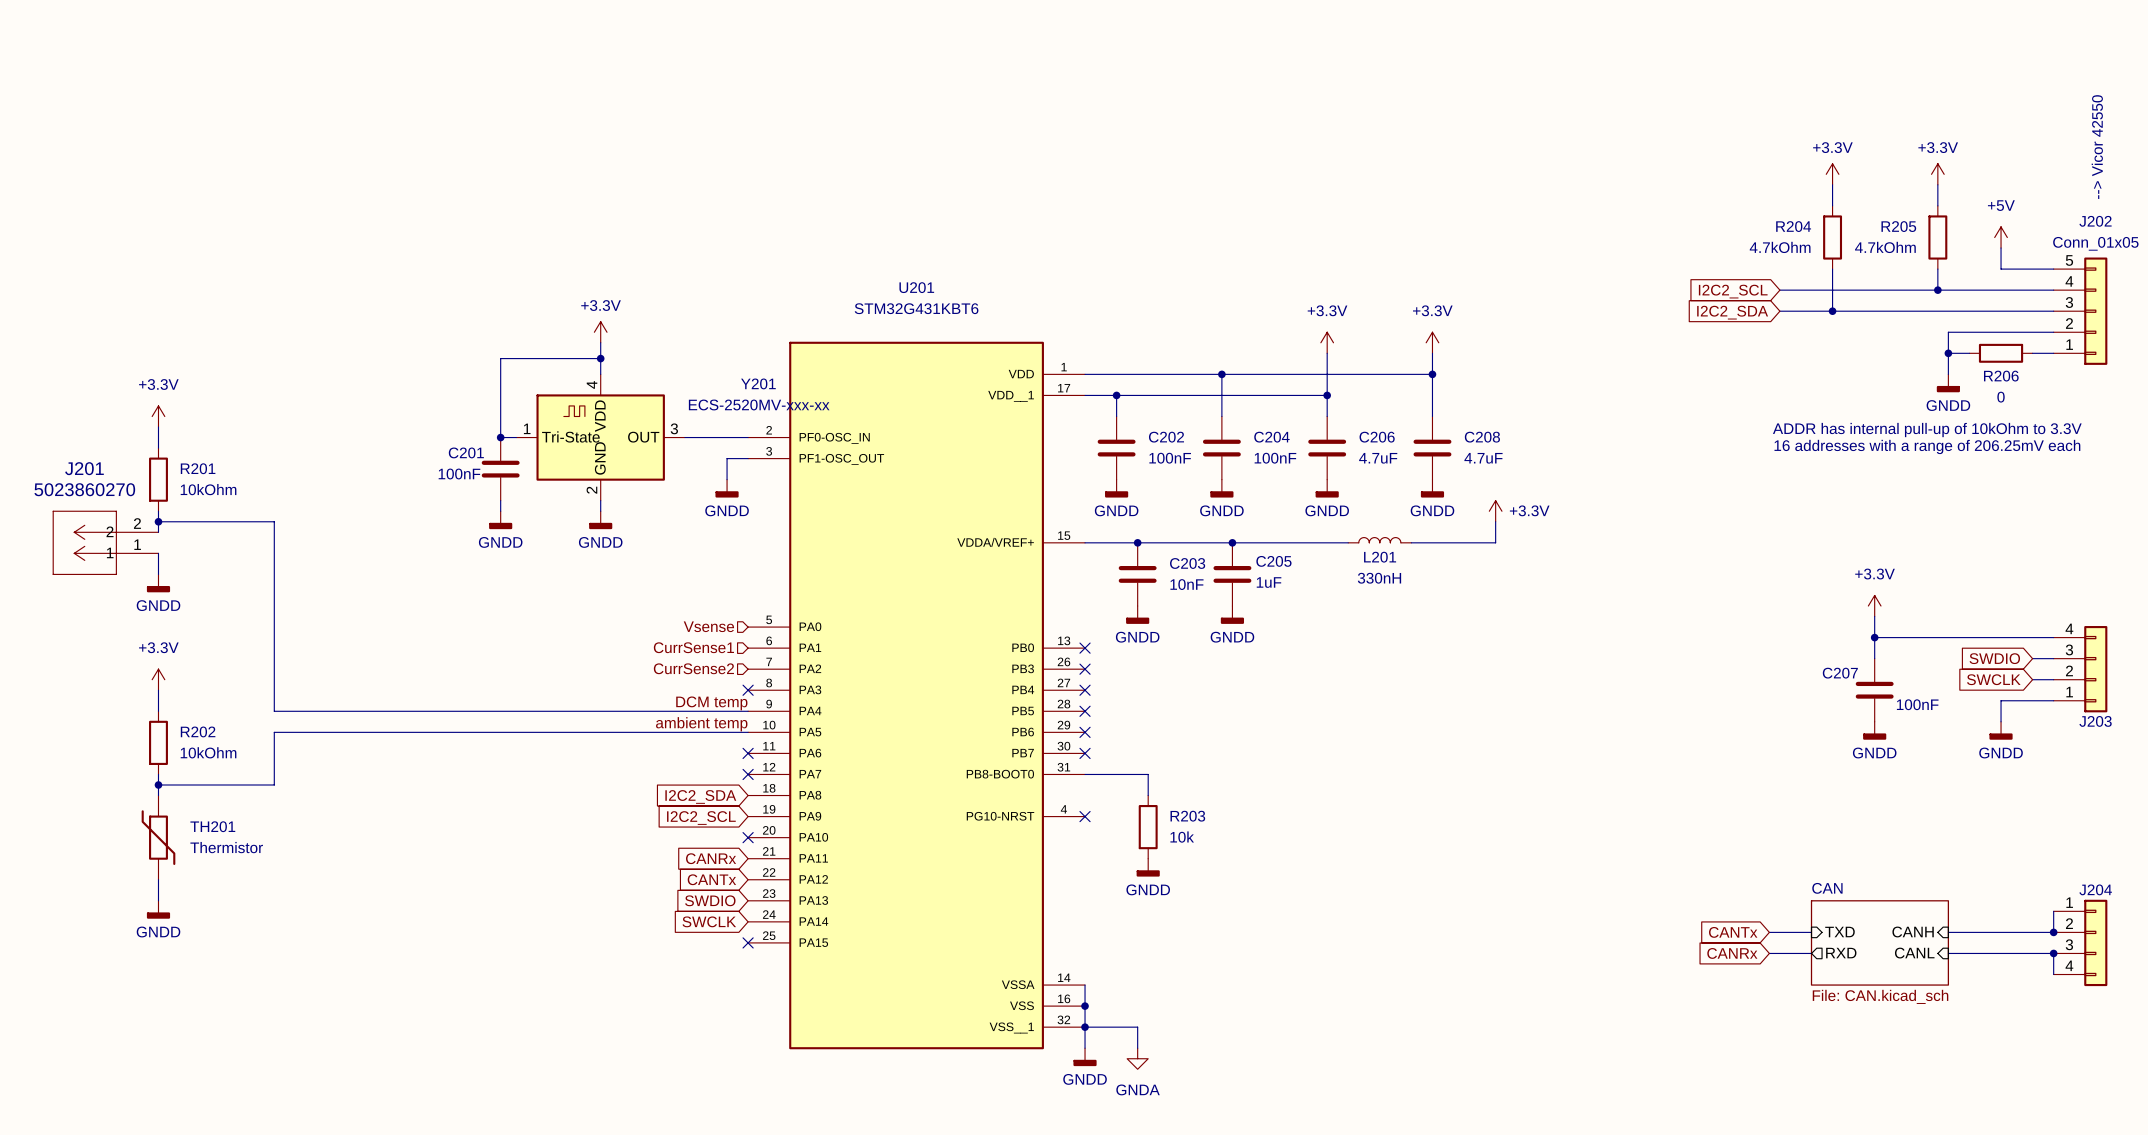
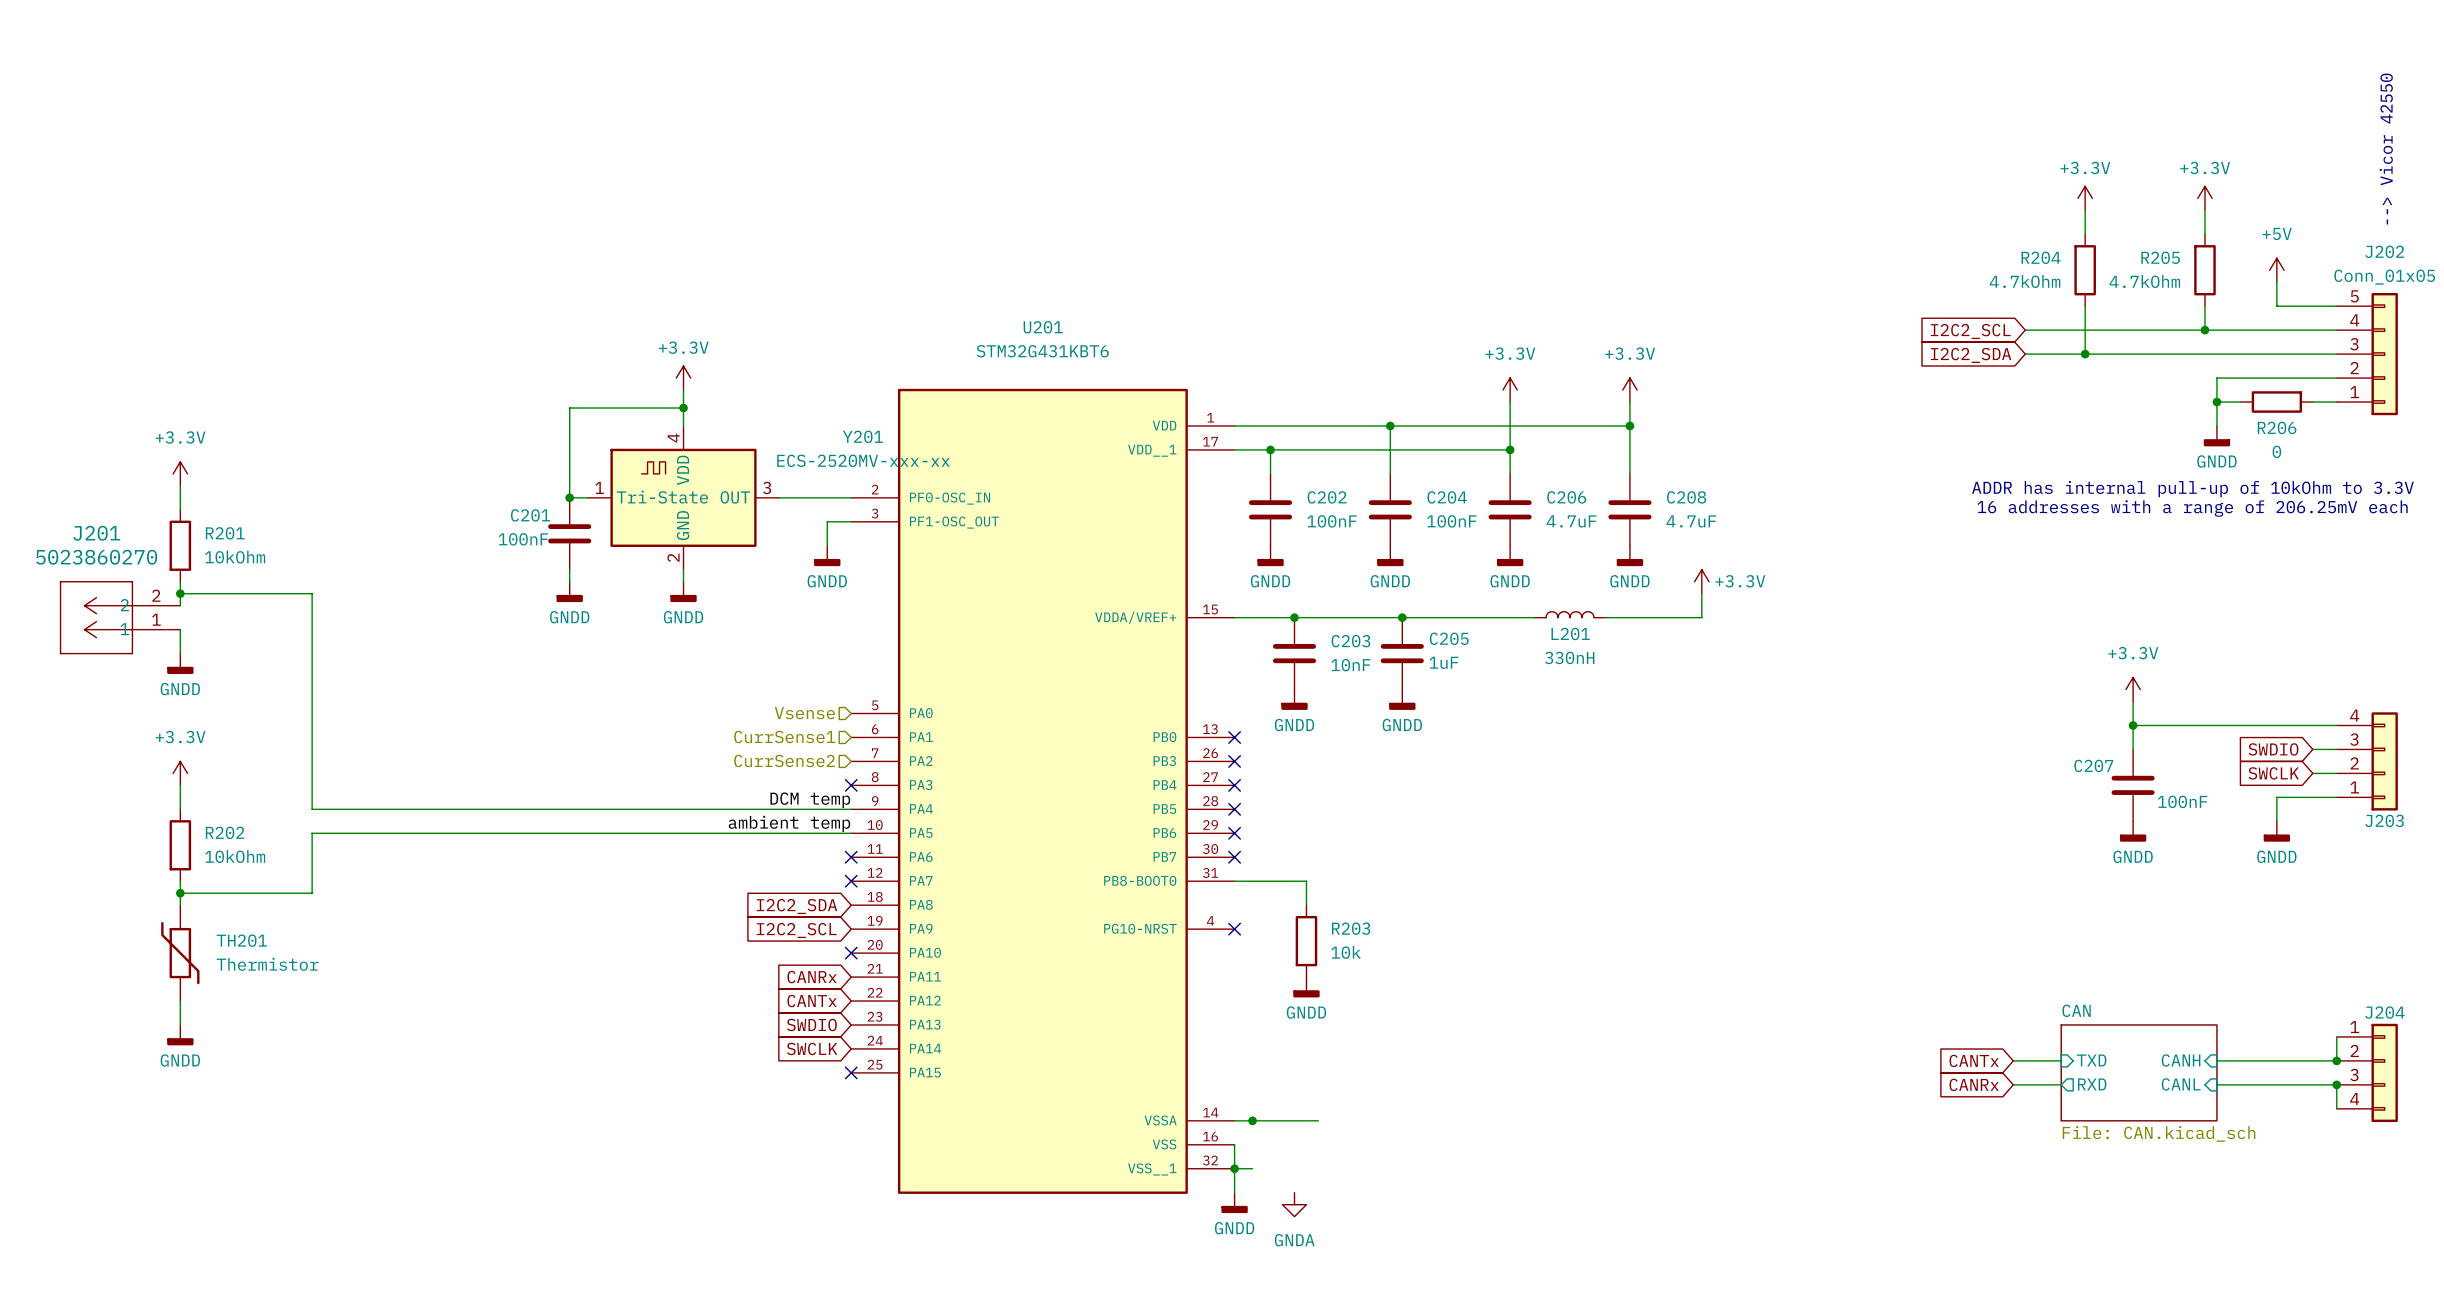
wire: (1085, 985) (1085, 1006) -> (1234, 1120) (1318, 1120)
junction position: (1085, 1006) -> (1252, 1120)
wire: (1100, 1027) (1137, 1027) (1137, 1048) -> none

